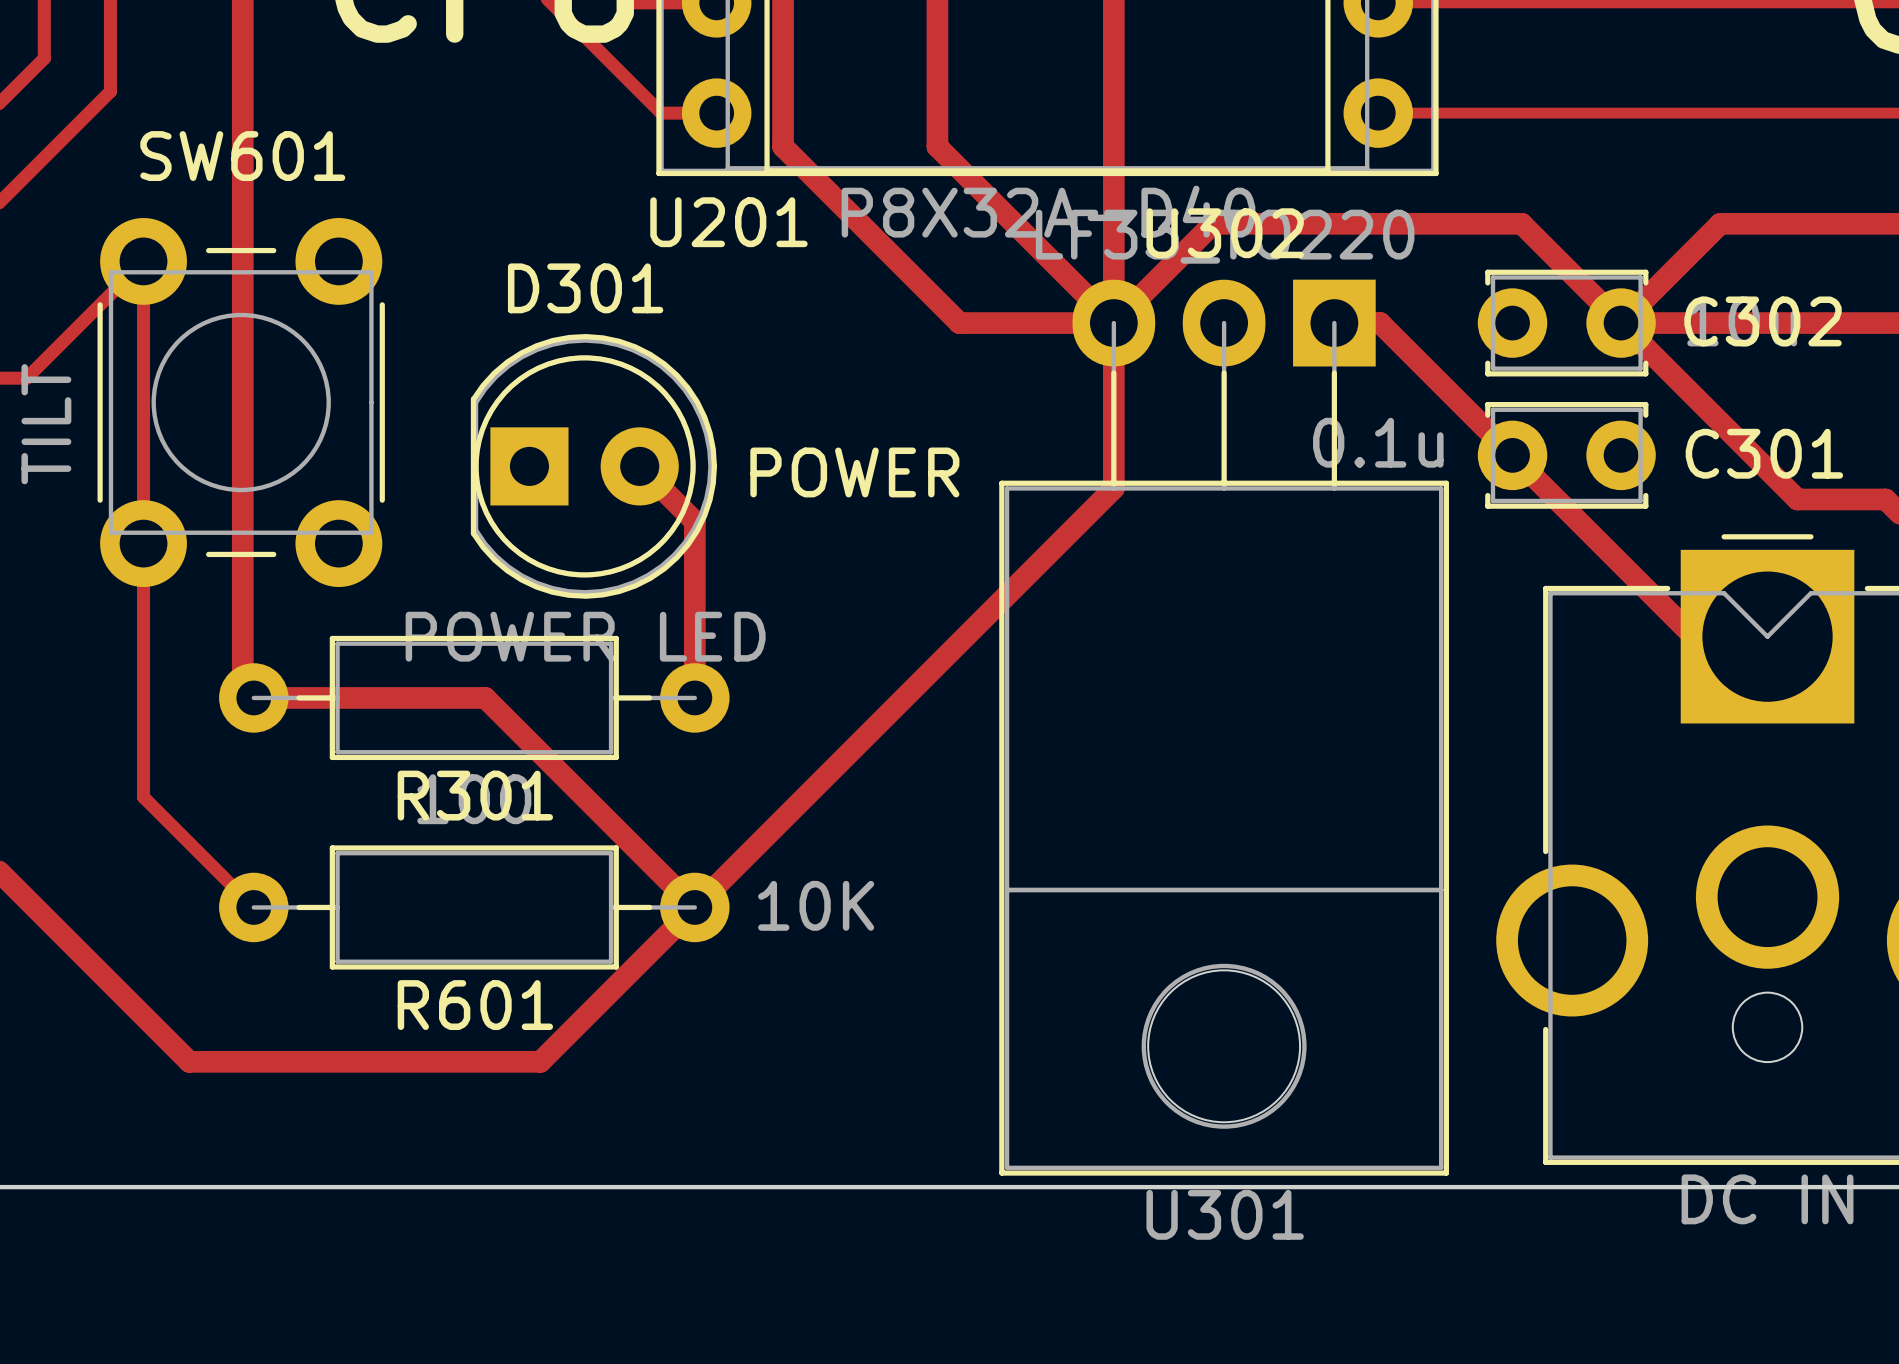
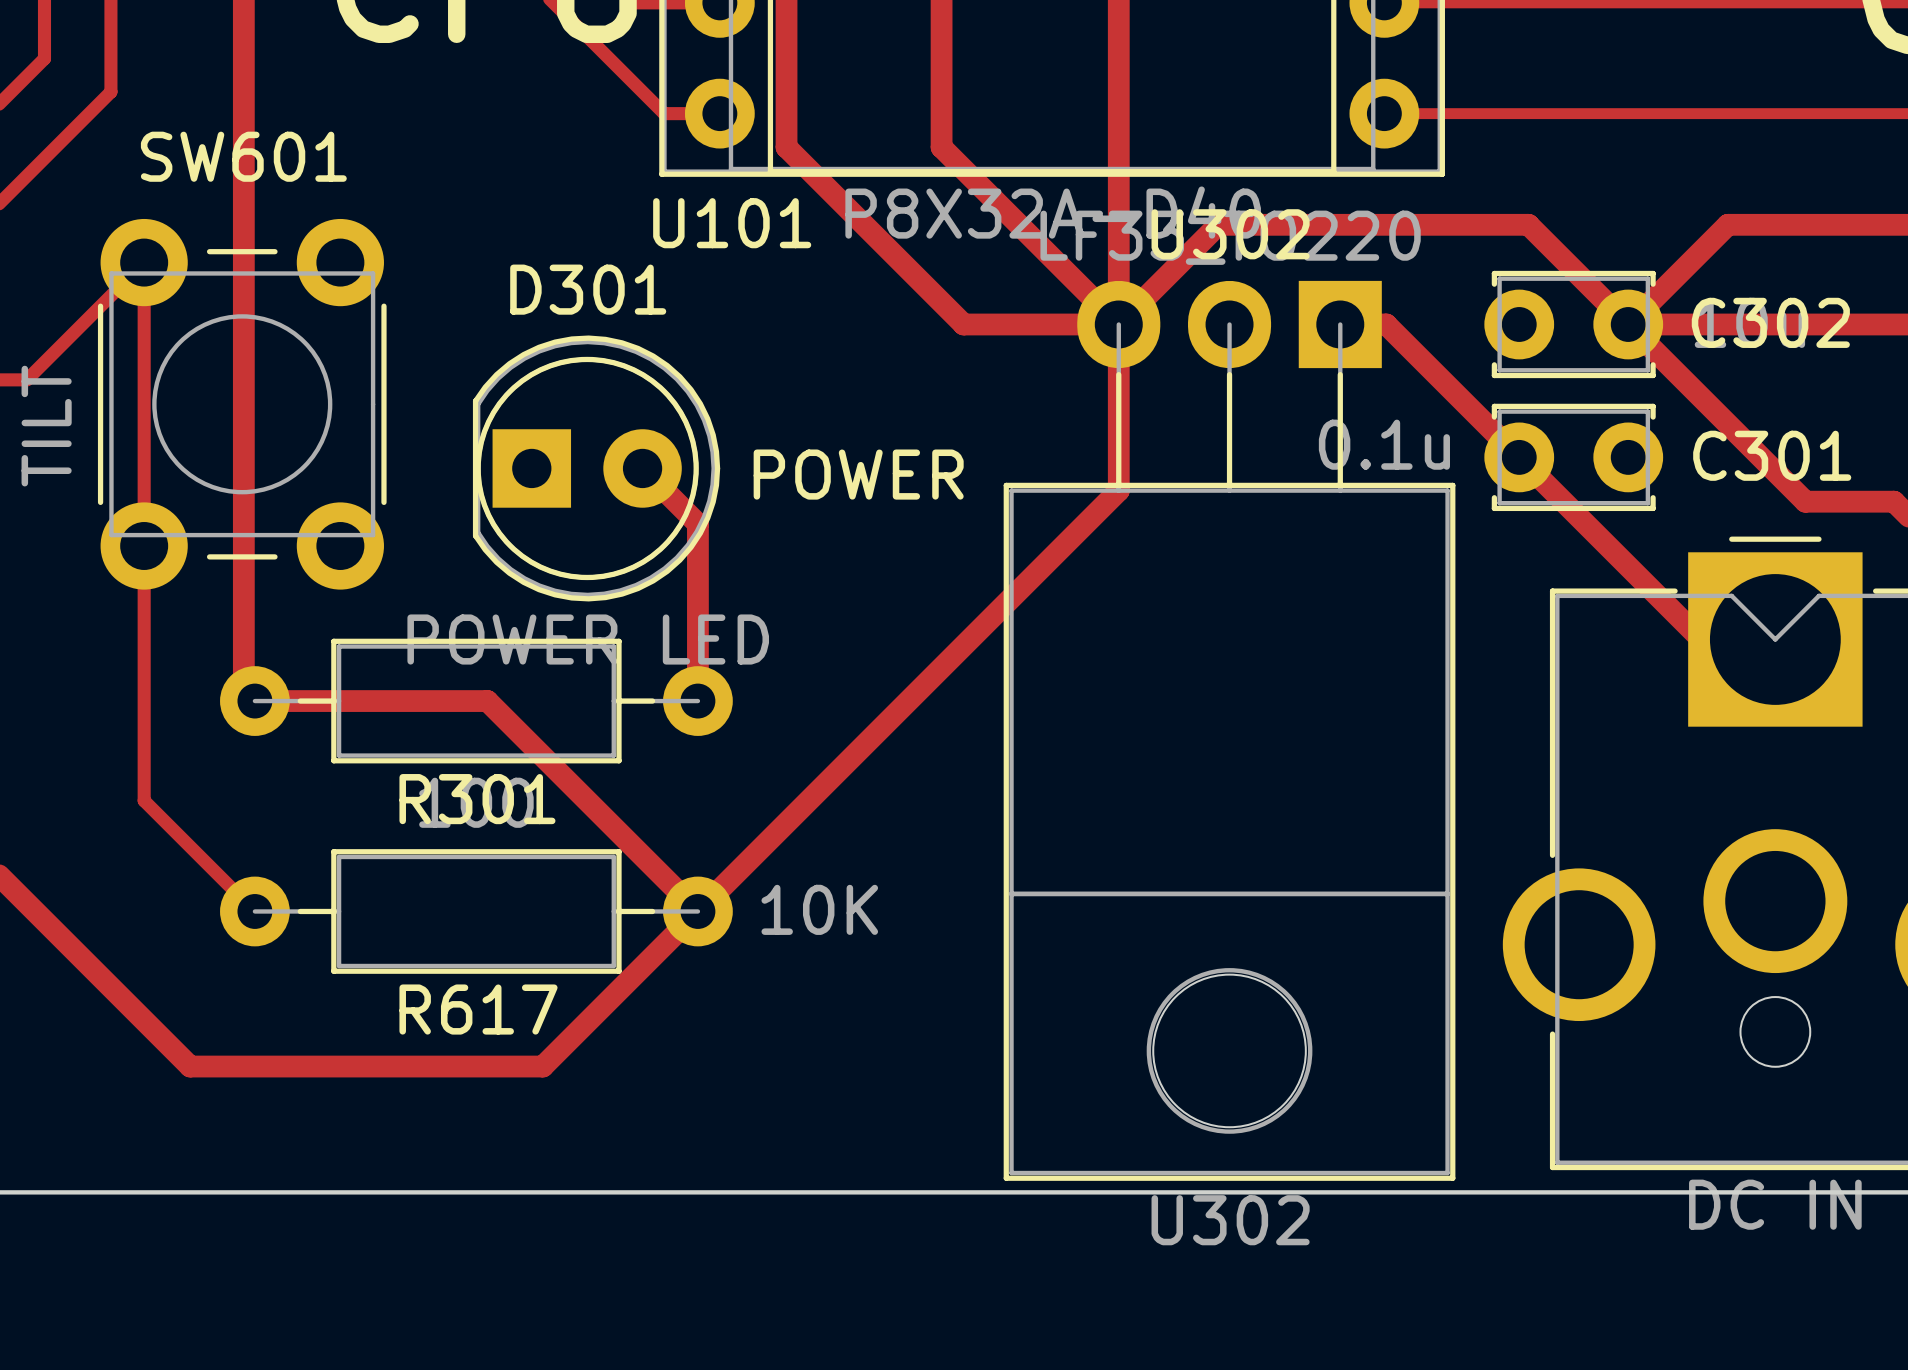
U201 name: U201 (728, 222) -> U101 (732, 223)
R601 name: R601 (475, 1005) -> R617 (478, 1009)
U301 name: U301 (1225, 1214) -> U302 (1230, 1220)

